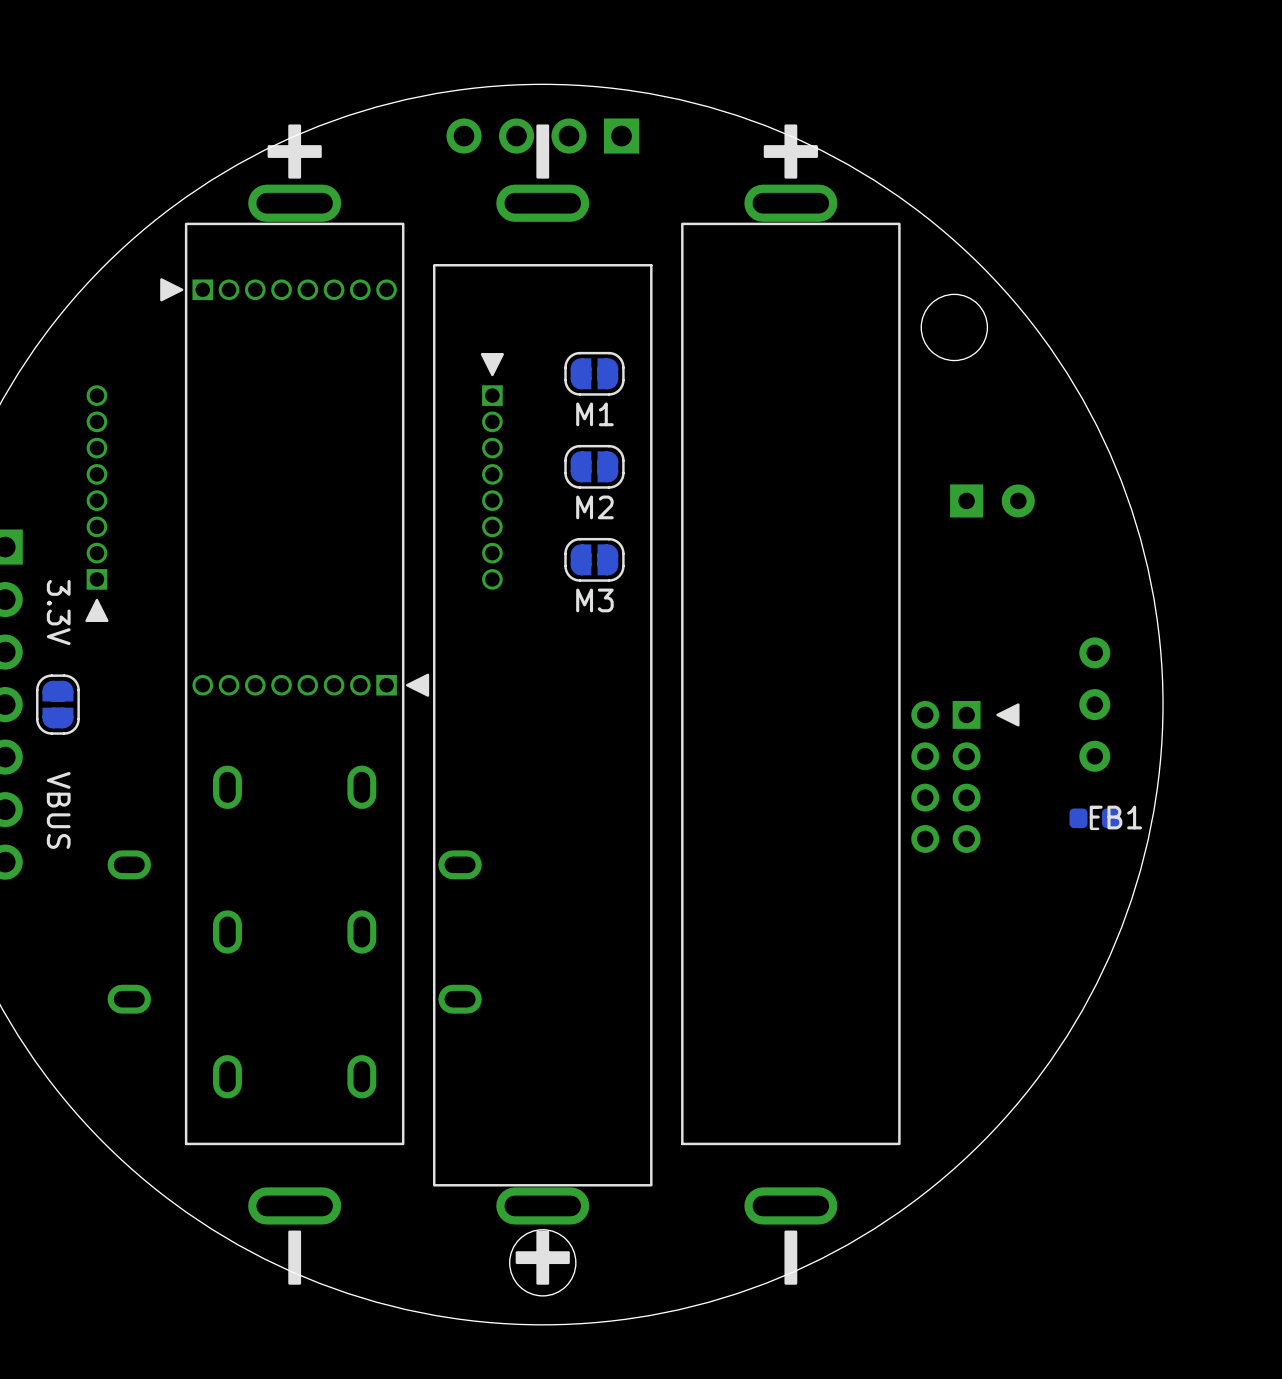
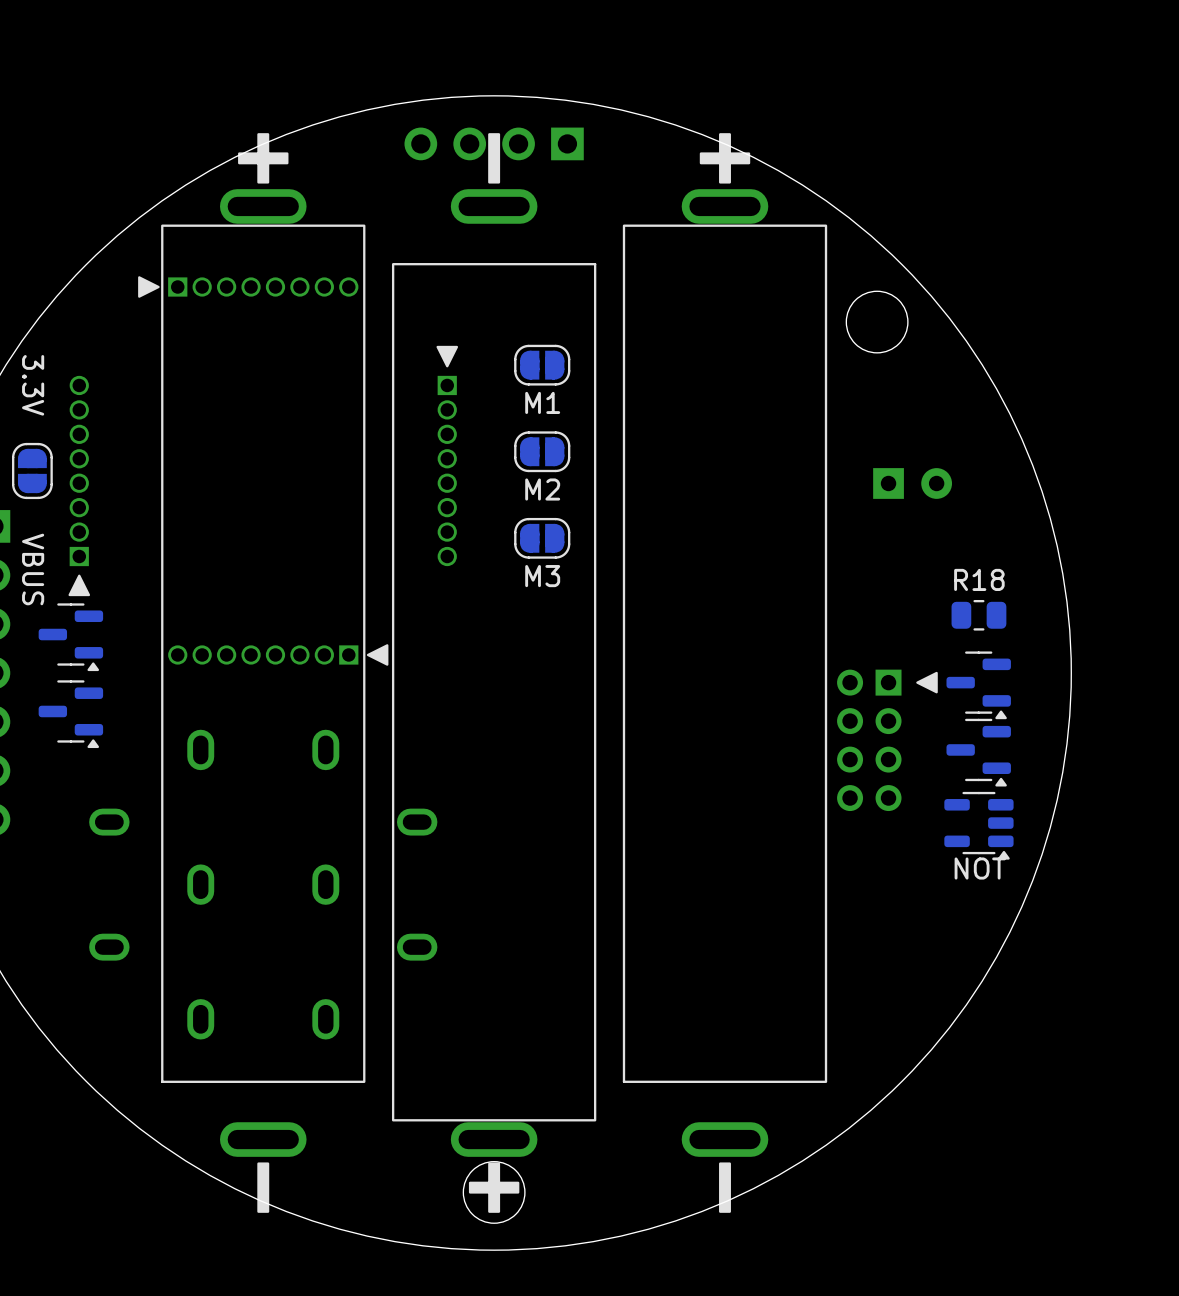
R18: none -> (978, 615)
part: none -> (70, 637)
3.3V VBUS position: (57, 704) -> (32, 470)
part: (1094, 704) -> none
part: none -> (978, 685)
part: none -> (70, 714)
part: none -> (978, 752)
FB1: (1094, 818) -> none
NOT: none -> (978, 825)

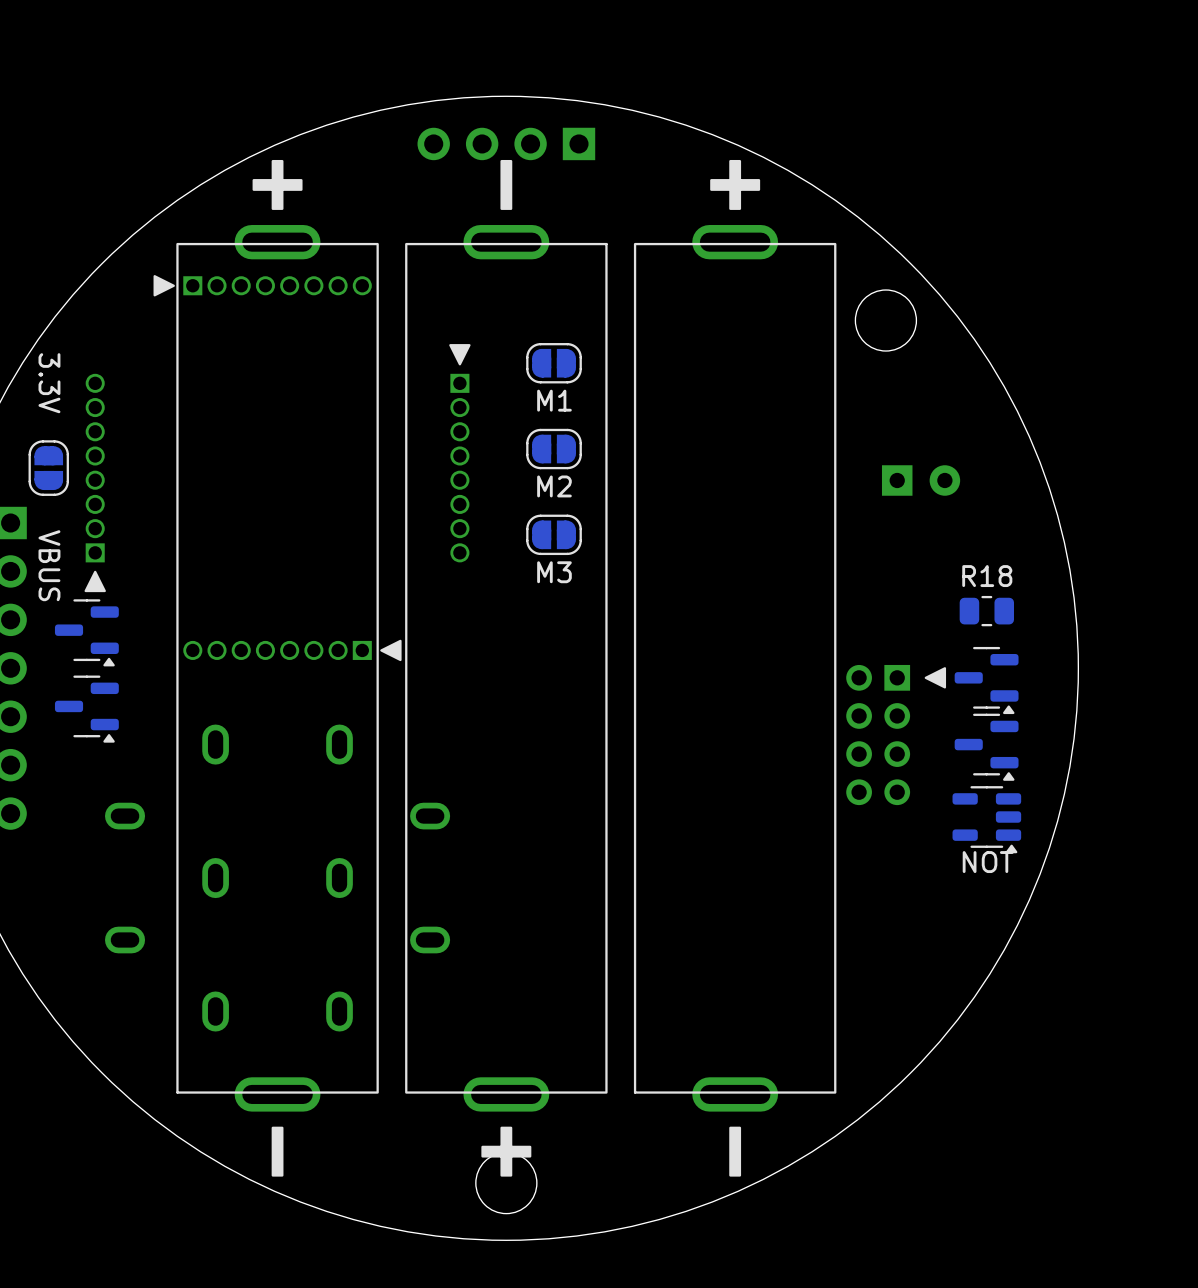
part footprint: [161, 133, 366, 1213] -> [176, 159, 379, 1177]
part footprint: [391, 133, 597, 1213] -> [405, 159, 608, 1177]
part footprint: [622, 133, 828, 1213] -> [633, 159, 837, 1177]

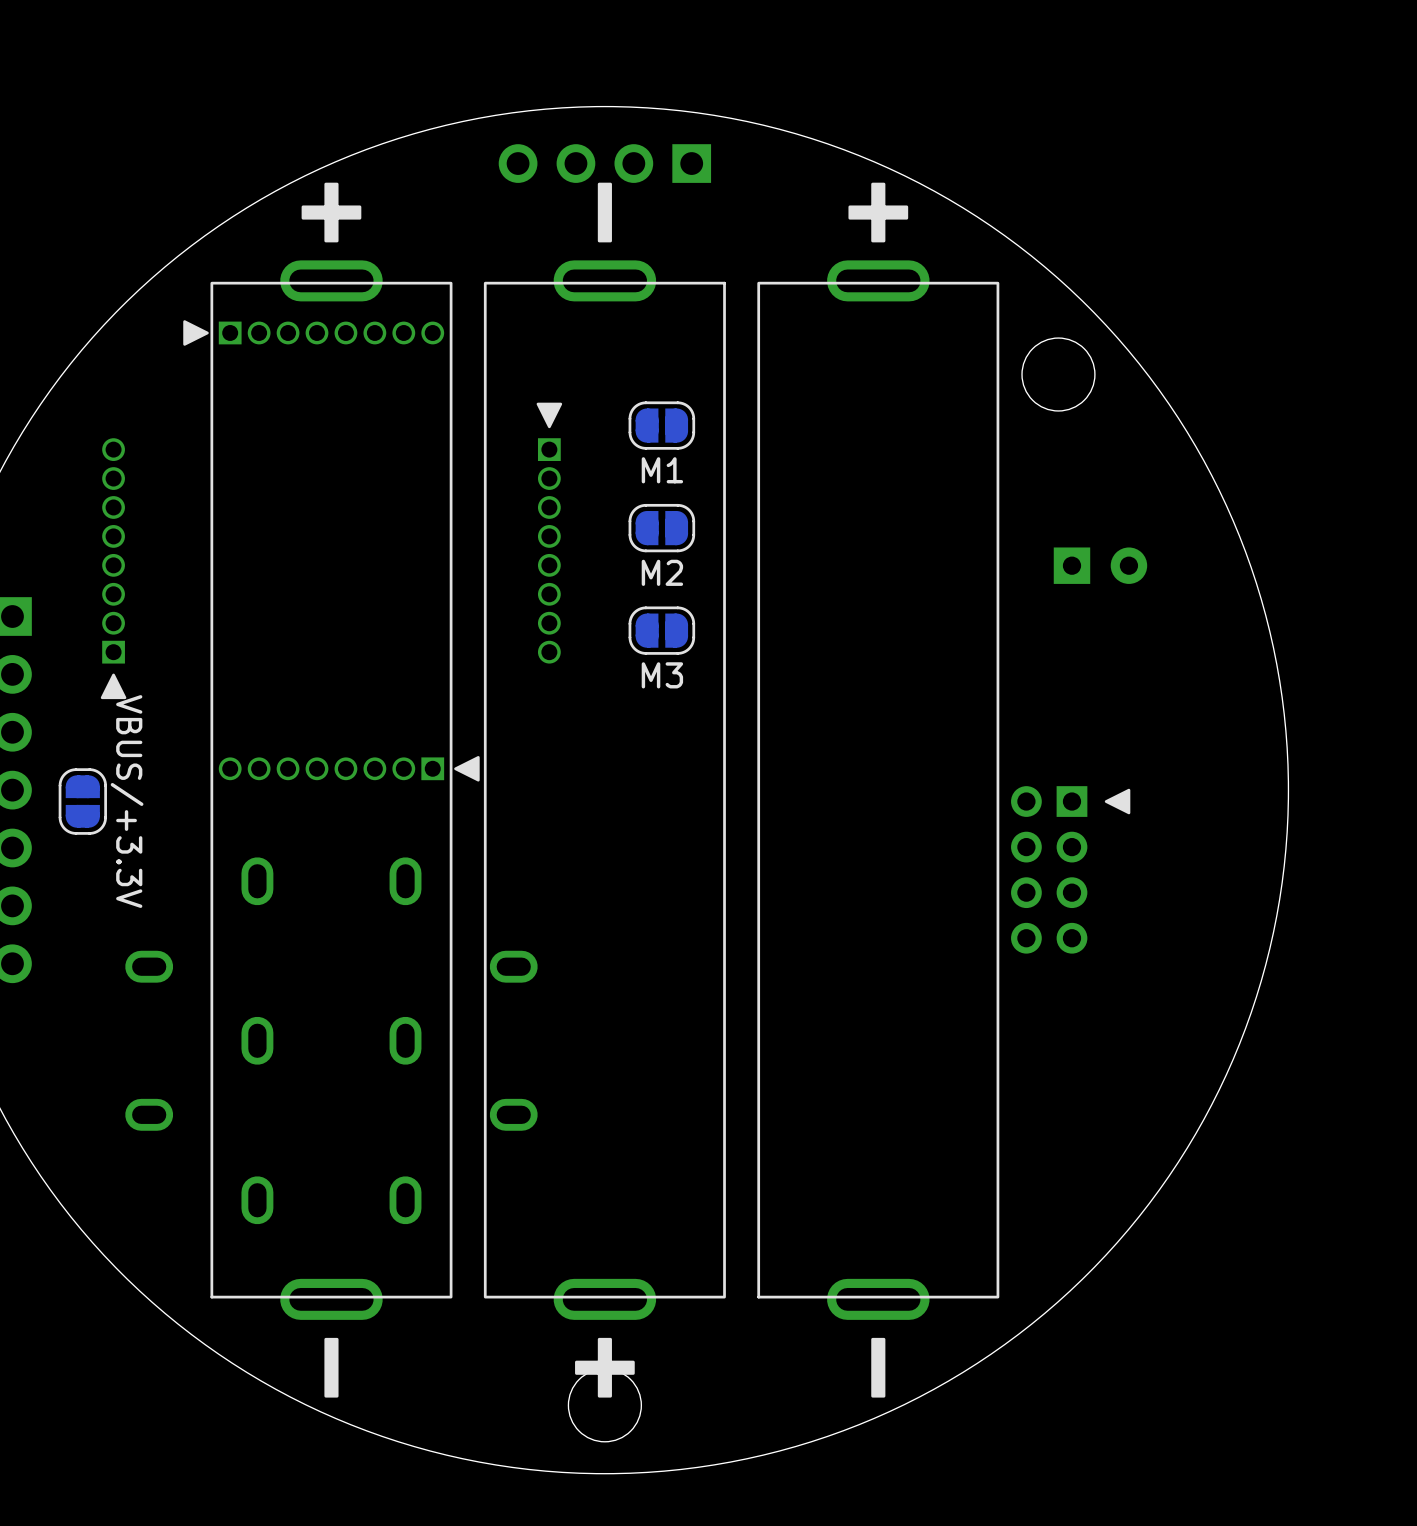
3.3V VBUS: (48, 468) -> none
R18: (986, 611) -> none
part: (86, 632) -> none
VBUS/+3.3V: none -> (82, 801)
part: (986, 680) -> none
part: (86, 709) -> none
part: (986, 747) -> none
NOT: (986, 819) -> none

